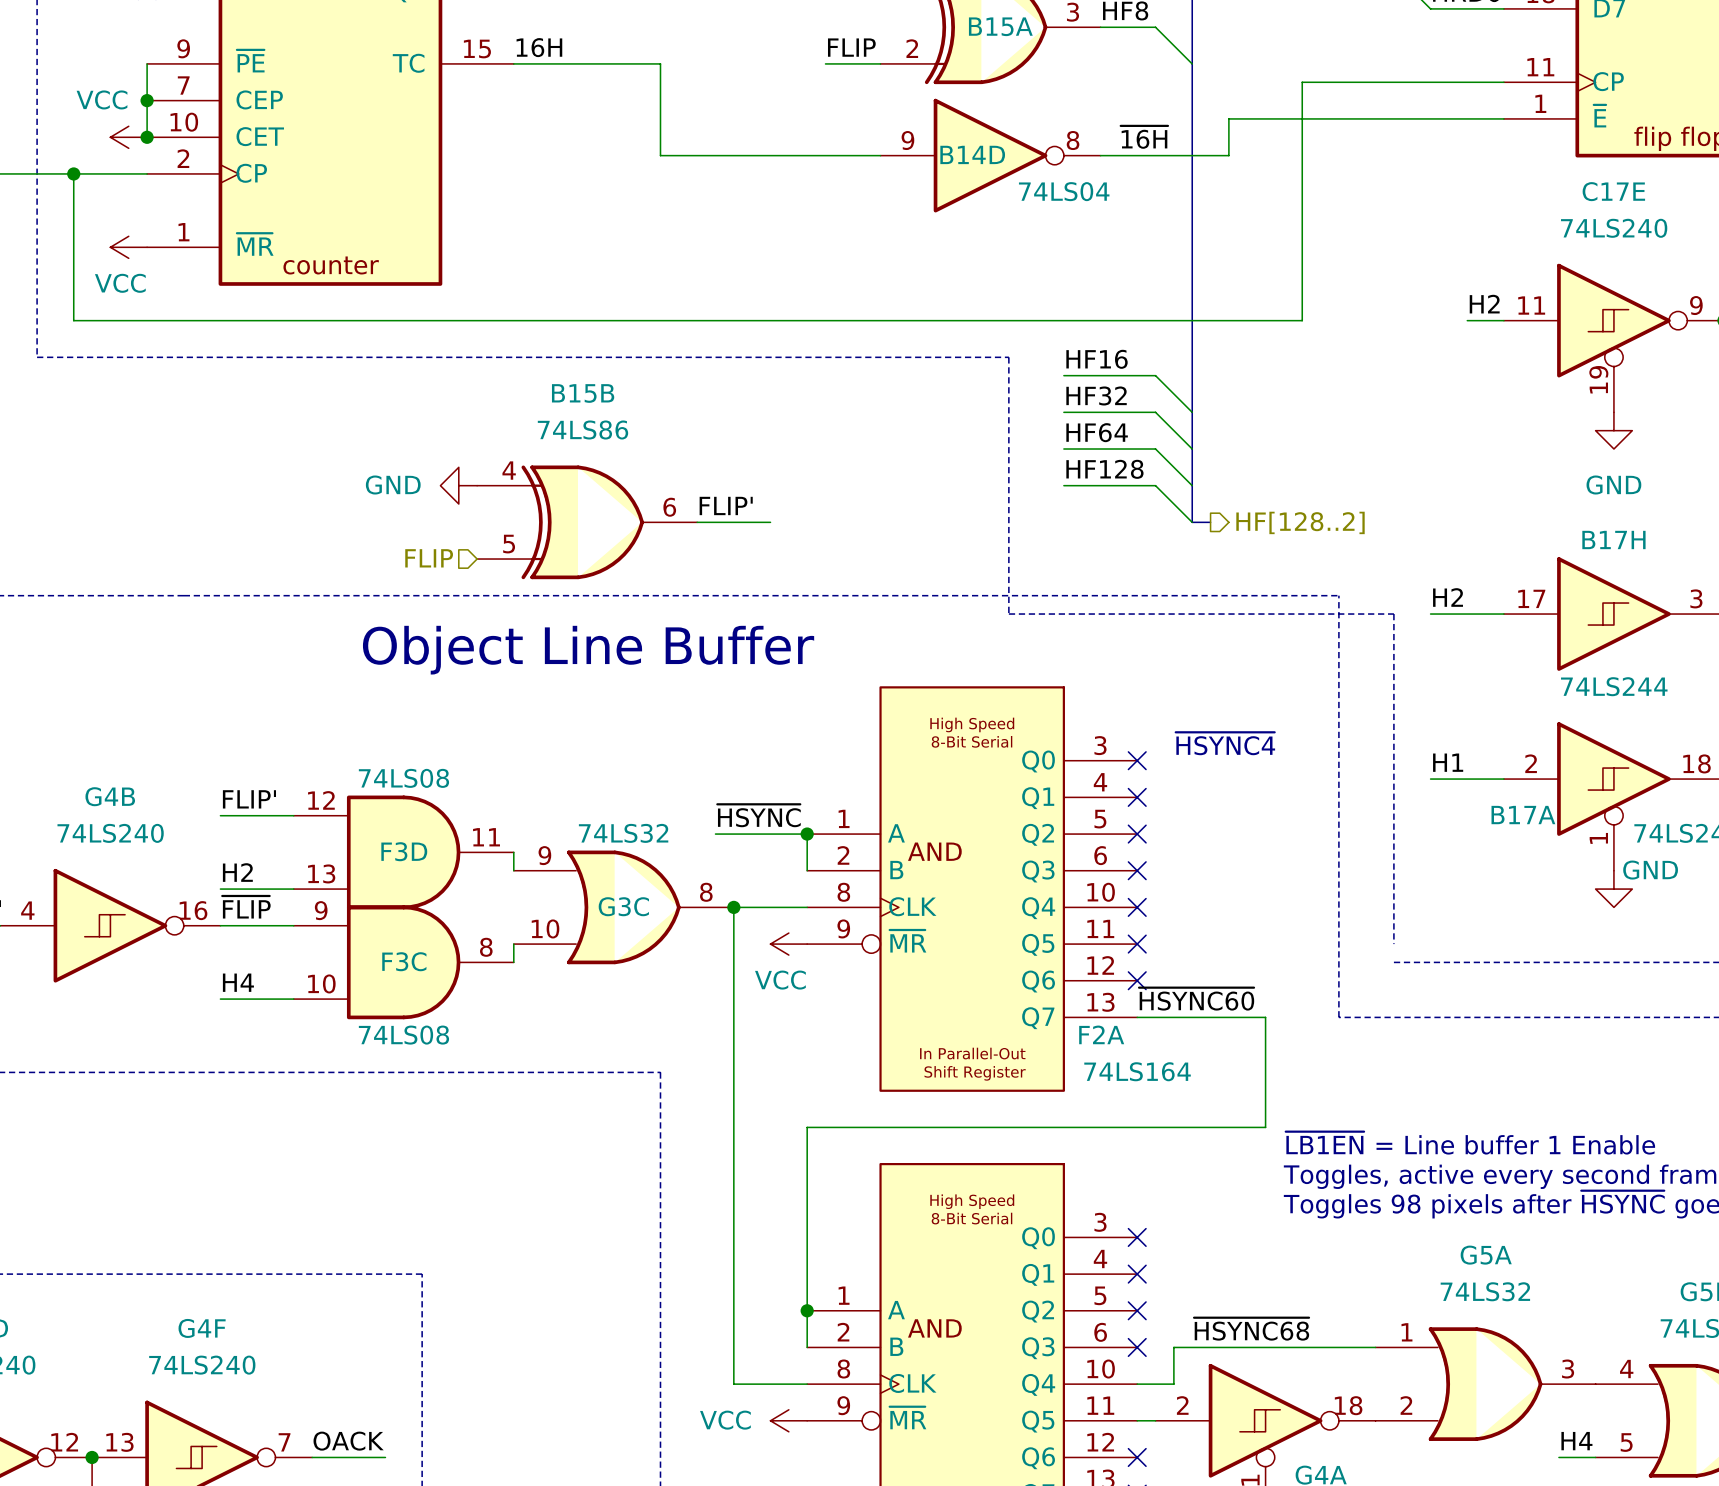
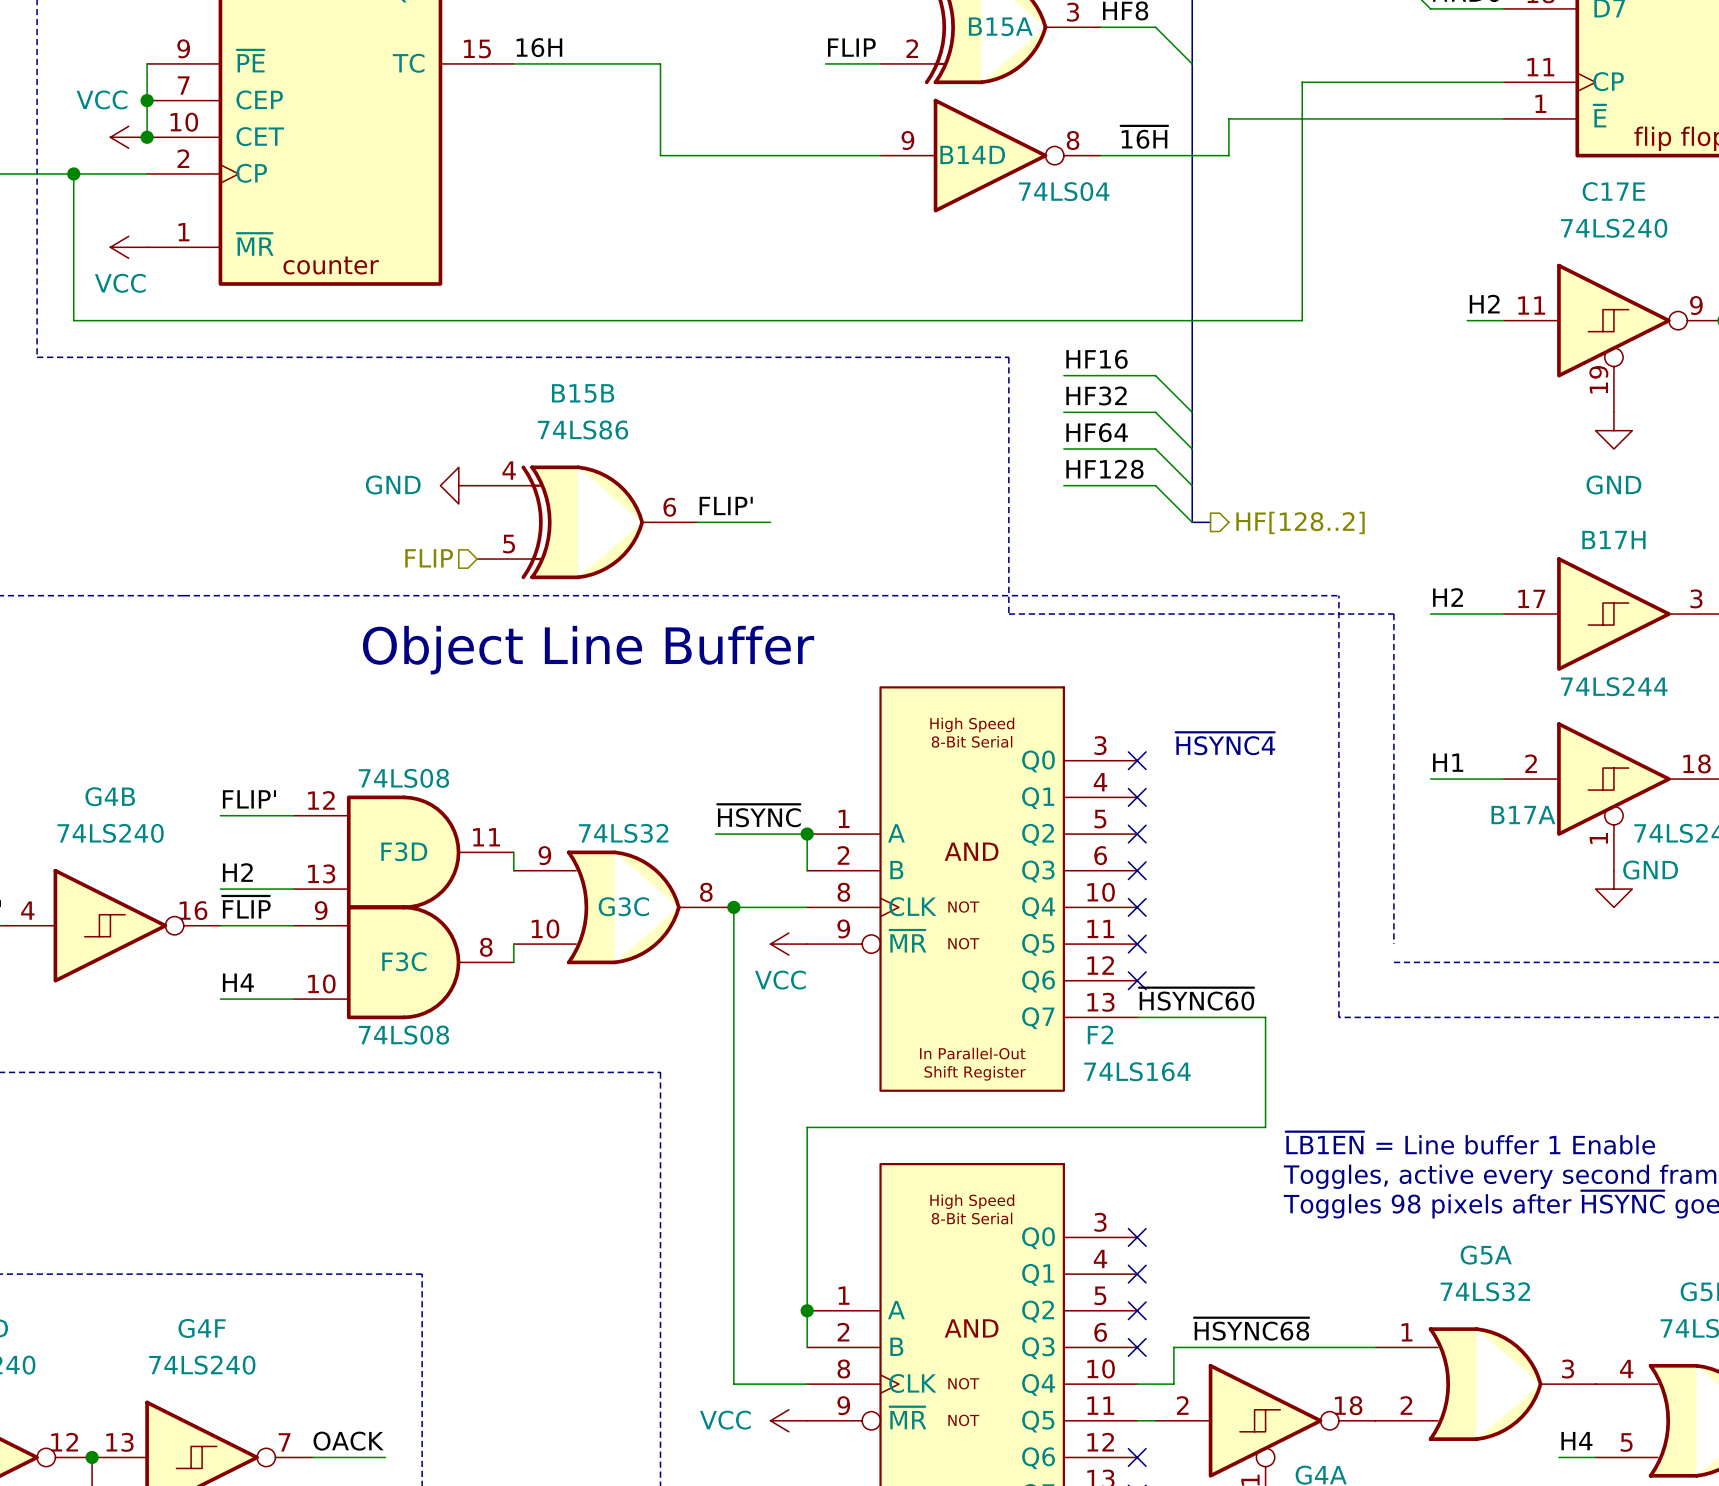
F2A text position: AND (934, 851) -> AND (971, 851)
F2A text: none -> NOT (963, 906)
F2A text: none -> NOT (963, 943)
F2A name: F2A (1101, 1034) -> F2 (1100, 1034)
part text position: AND (934, 1328) -> AND (971, 1328)
part text: none -> NOT (963, 1383)
part text: none -> NOT (963, 1420)

